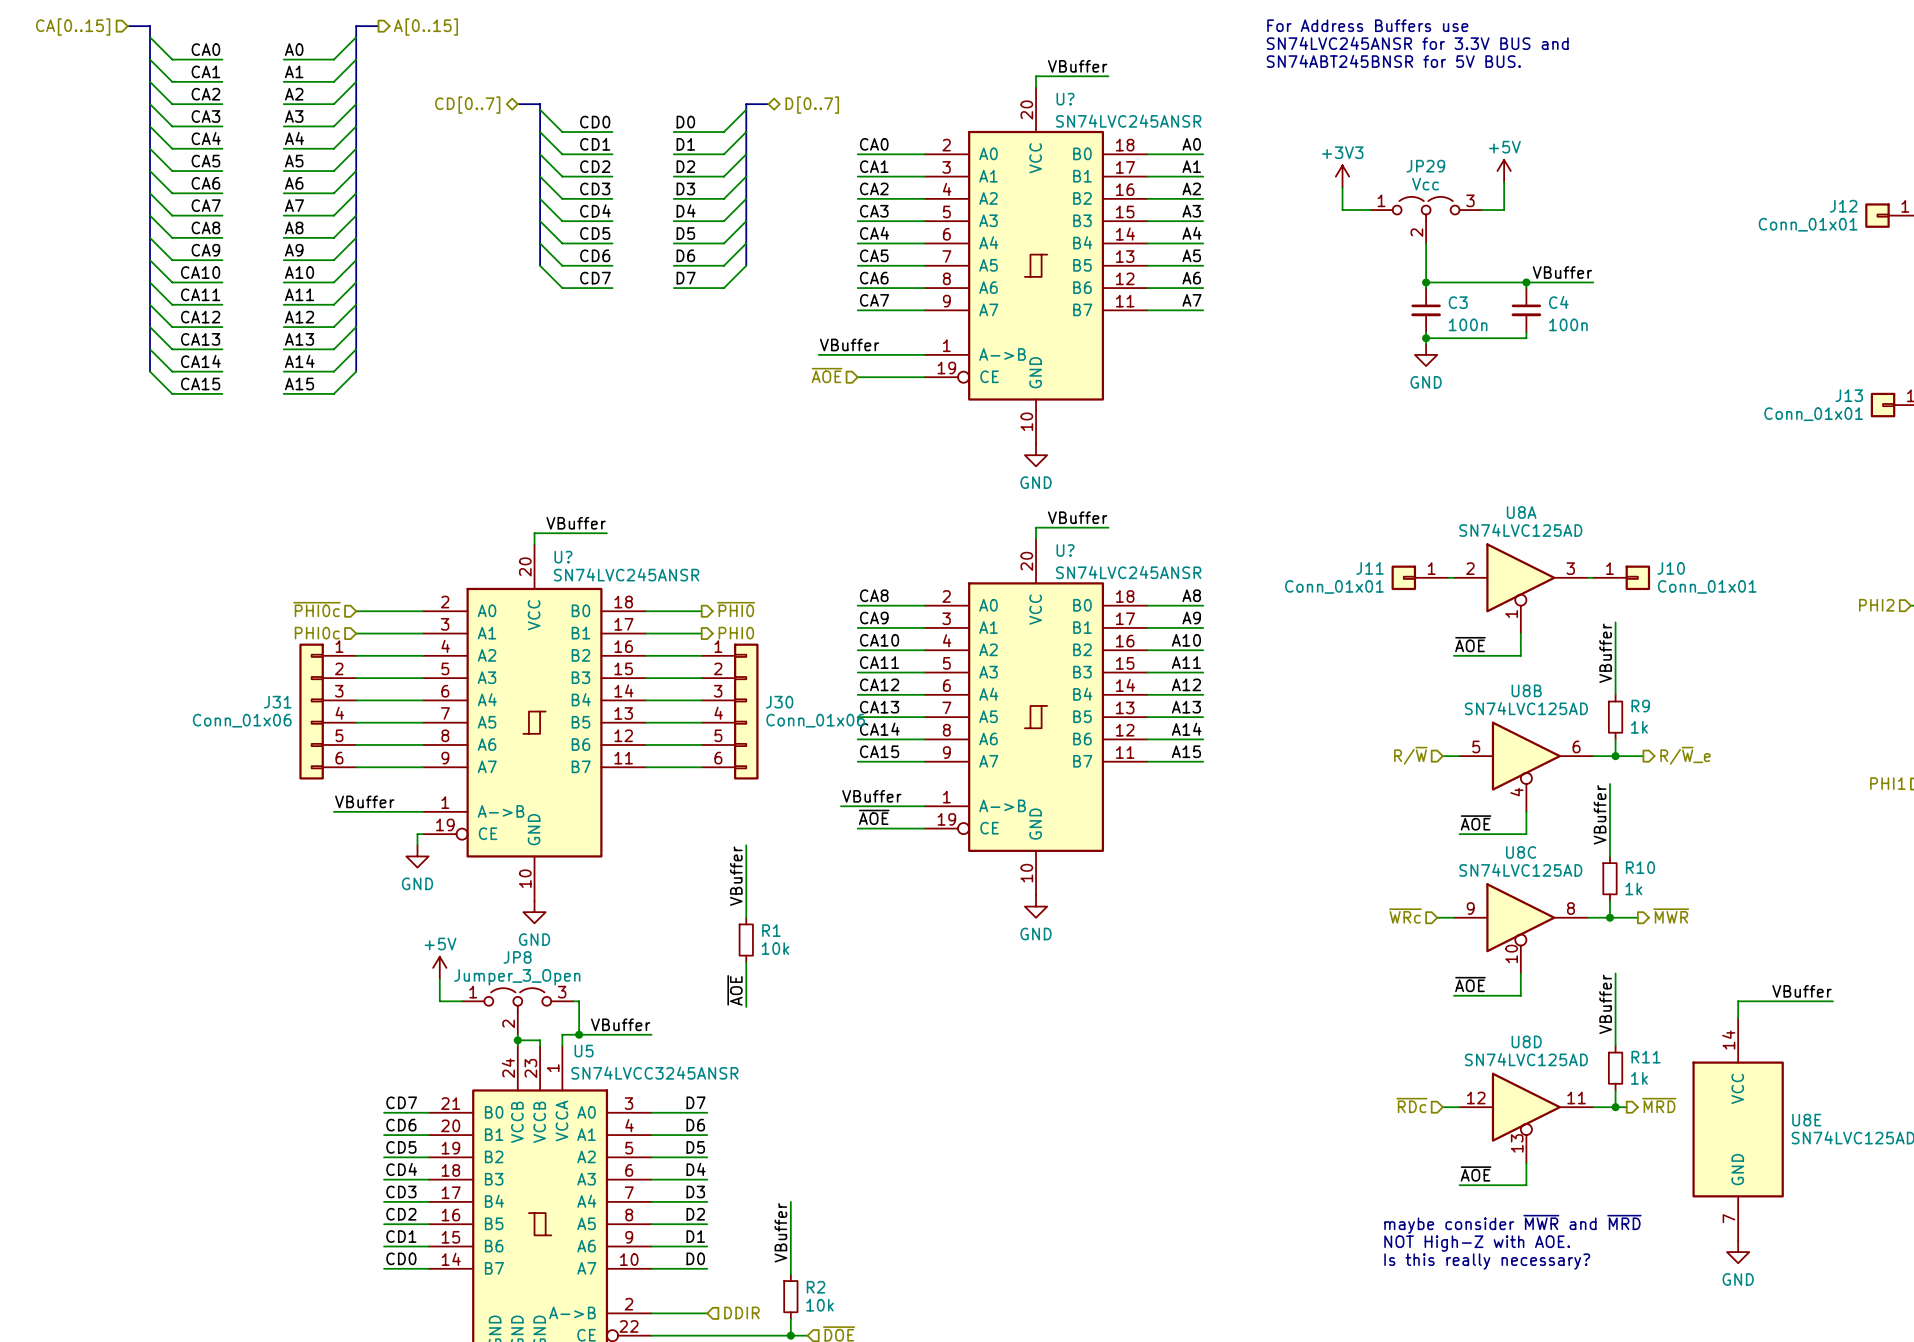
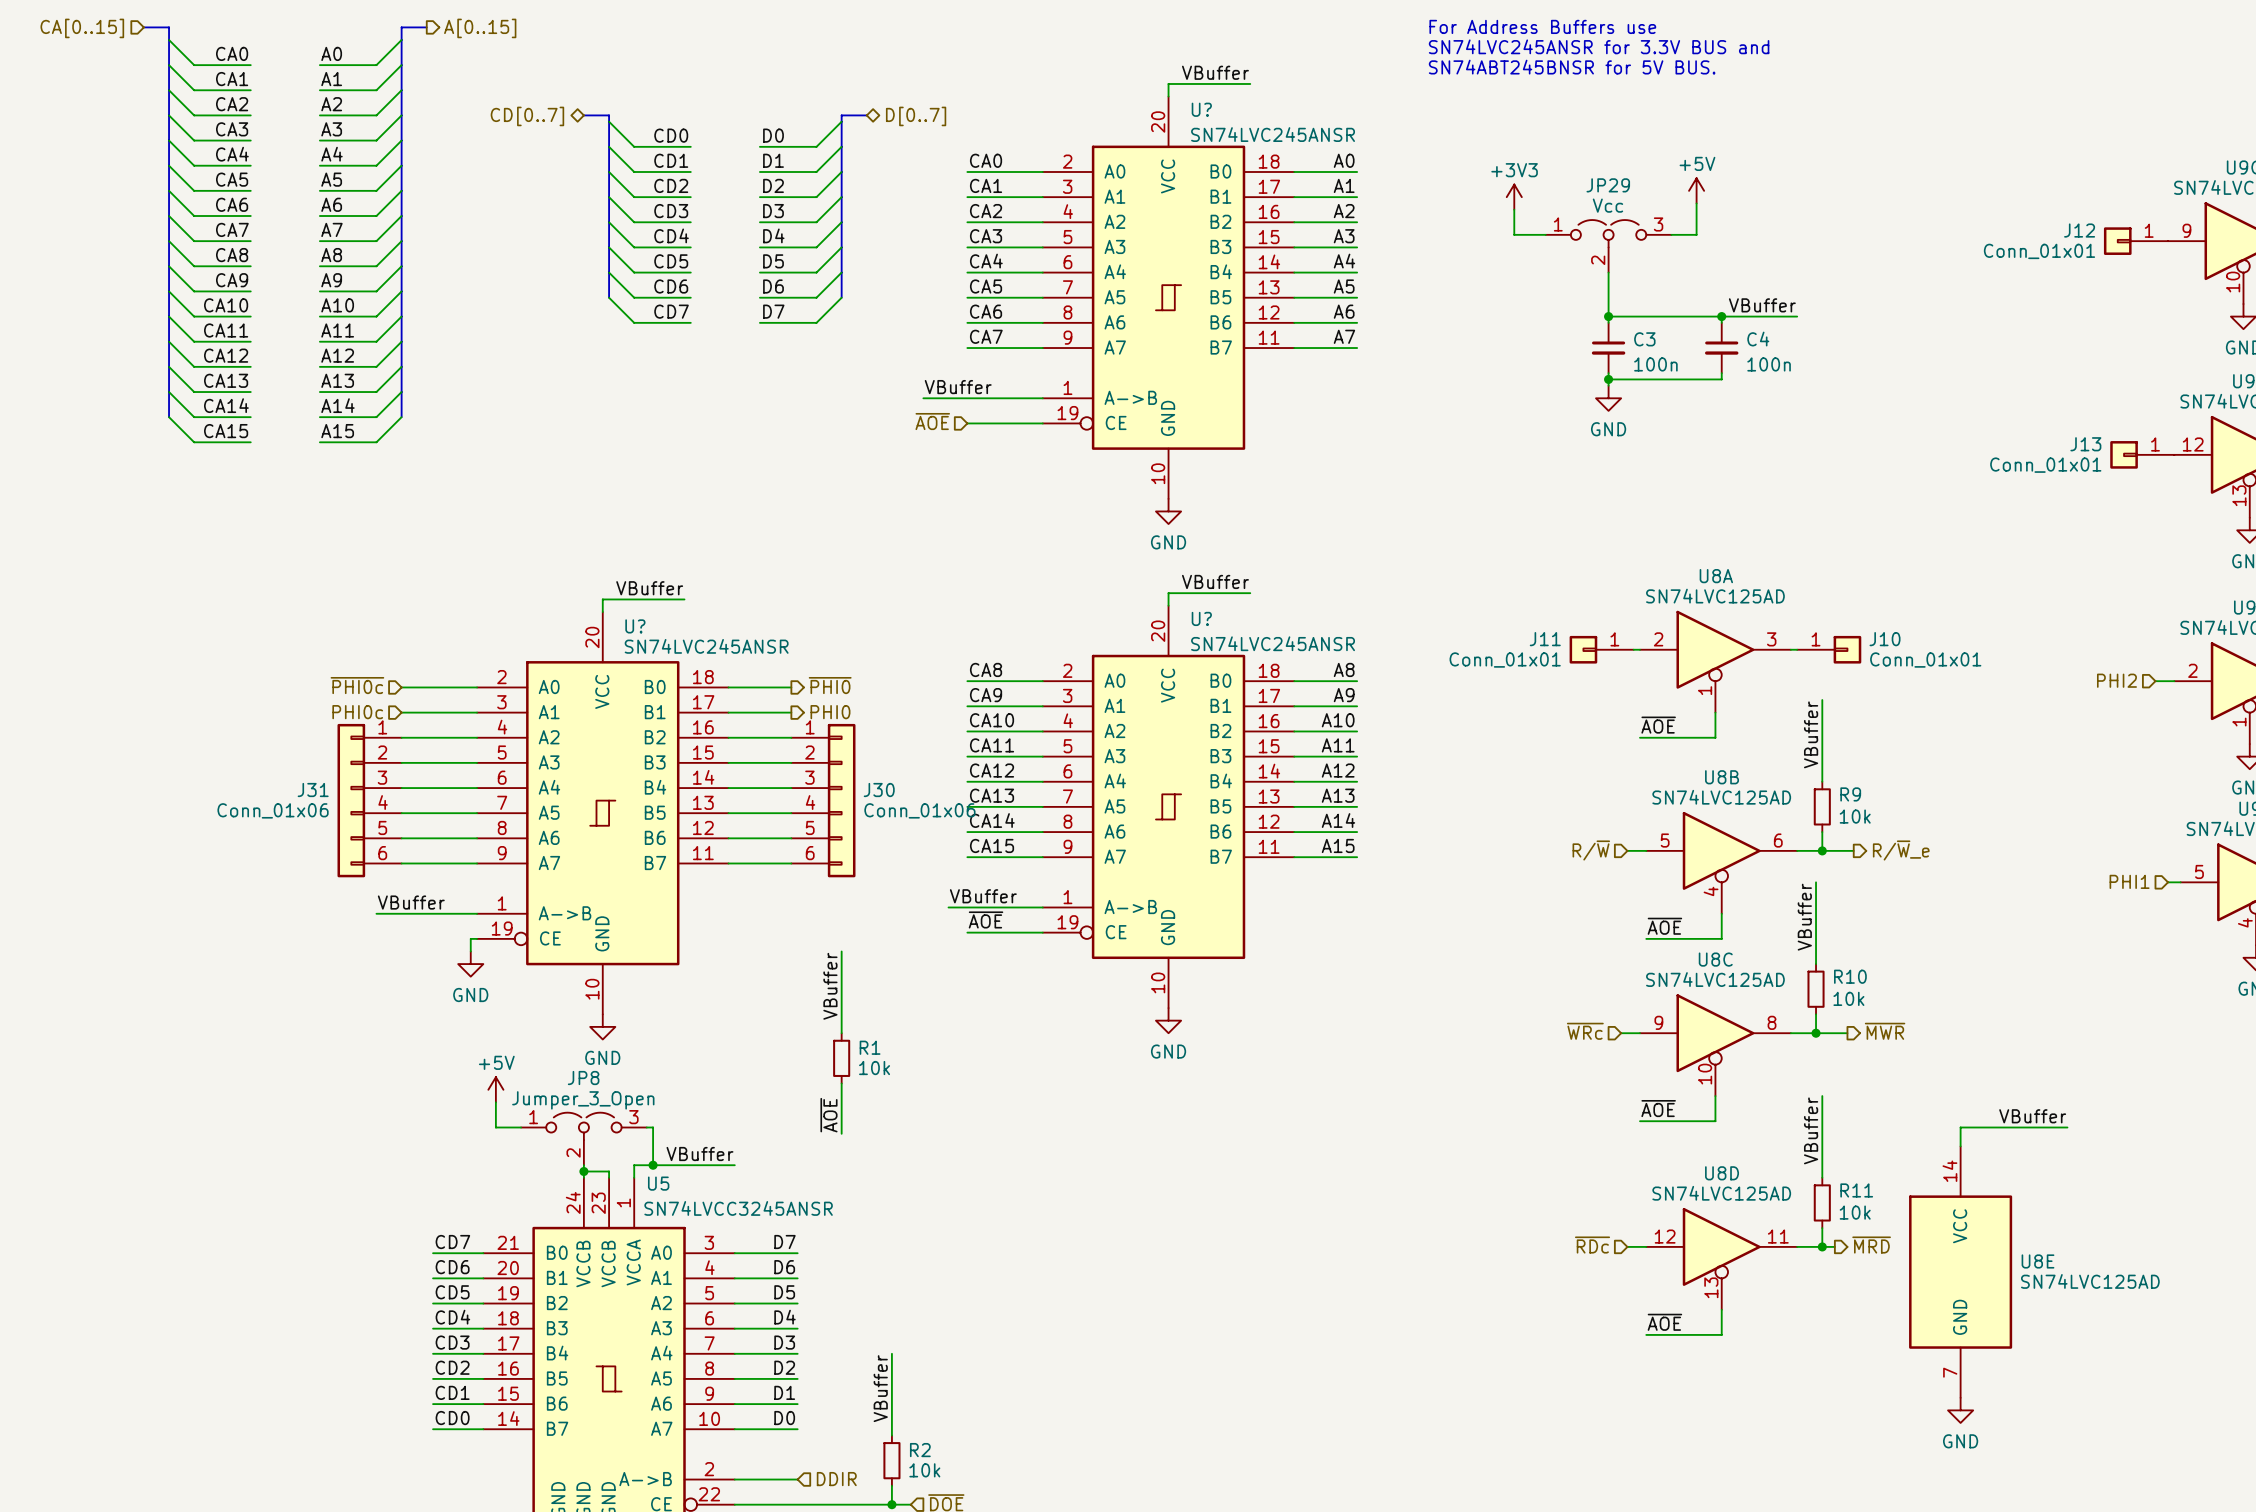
R9 value: 1k (1639, 727) -> 10k (1855, 816)
R10 value: 1k (1633, 888) -> 10k (1848, 998)
R11 value: 1k (1639, 1078) -> 10k (1855, 1212)
text: maybe consider ~{MWR} and ~{MRD} (1512, 1224) -> none
text: NOT High-Z with AOE. (1477, 1243) -> none
text: Is this really necessary? (1487, 1261) -> none

